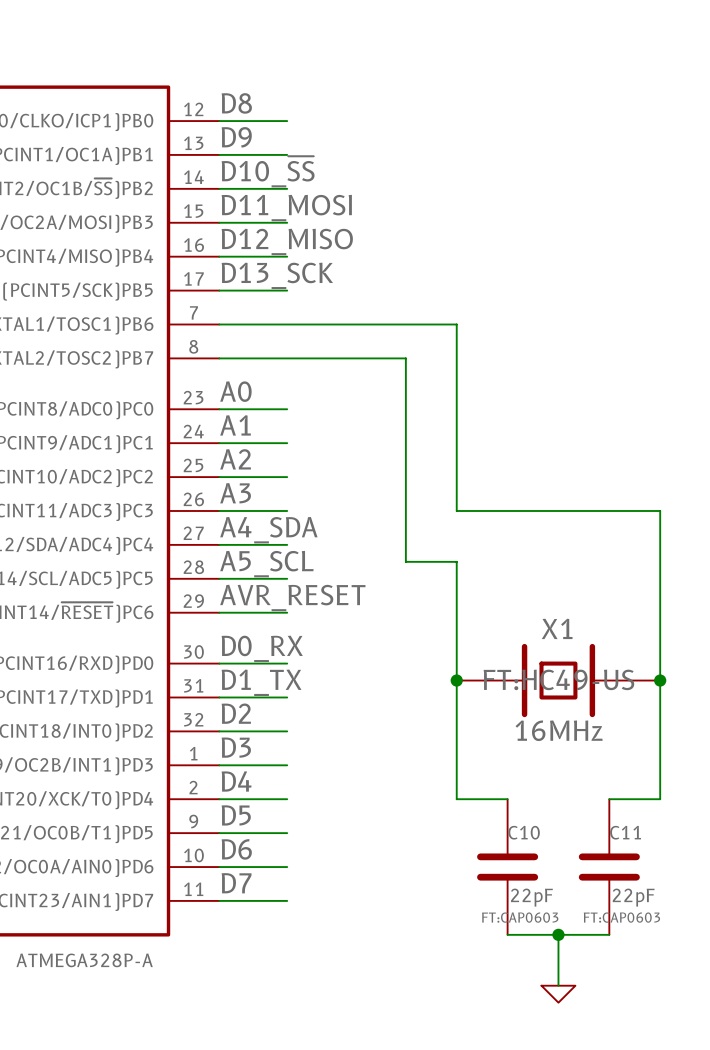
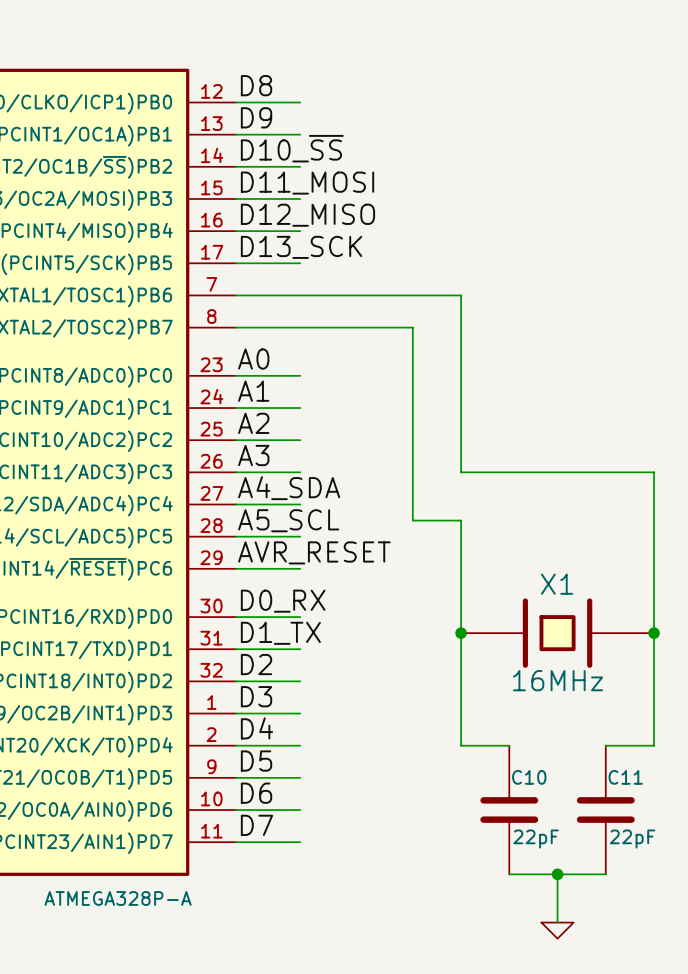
X1 text: FT:HC49-US (558, 679) -> none
C10 text: FT:CAP0603 (520, 917) -> none
C11 text: FT:CAP0603 (621, 917) -> none

